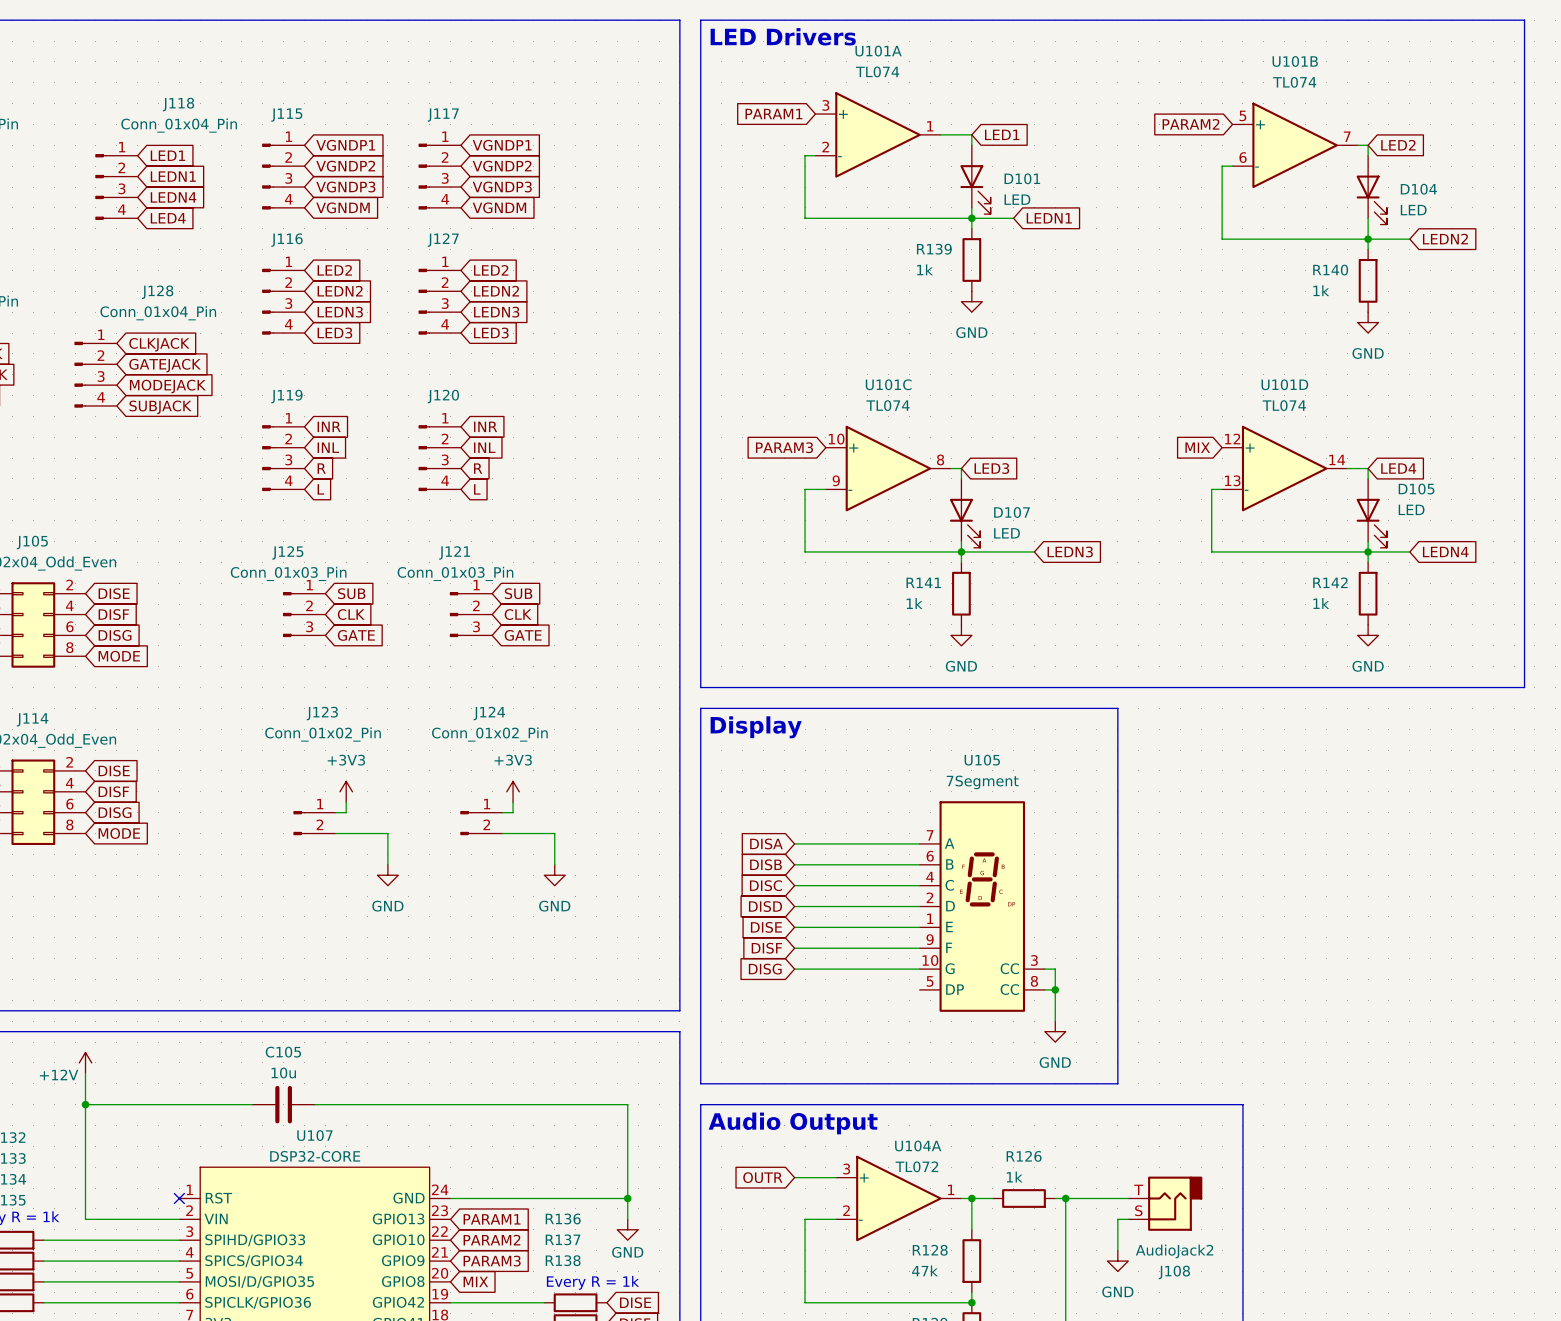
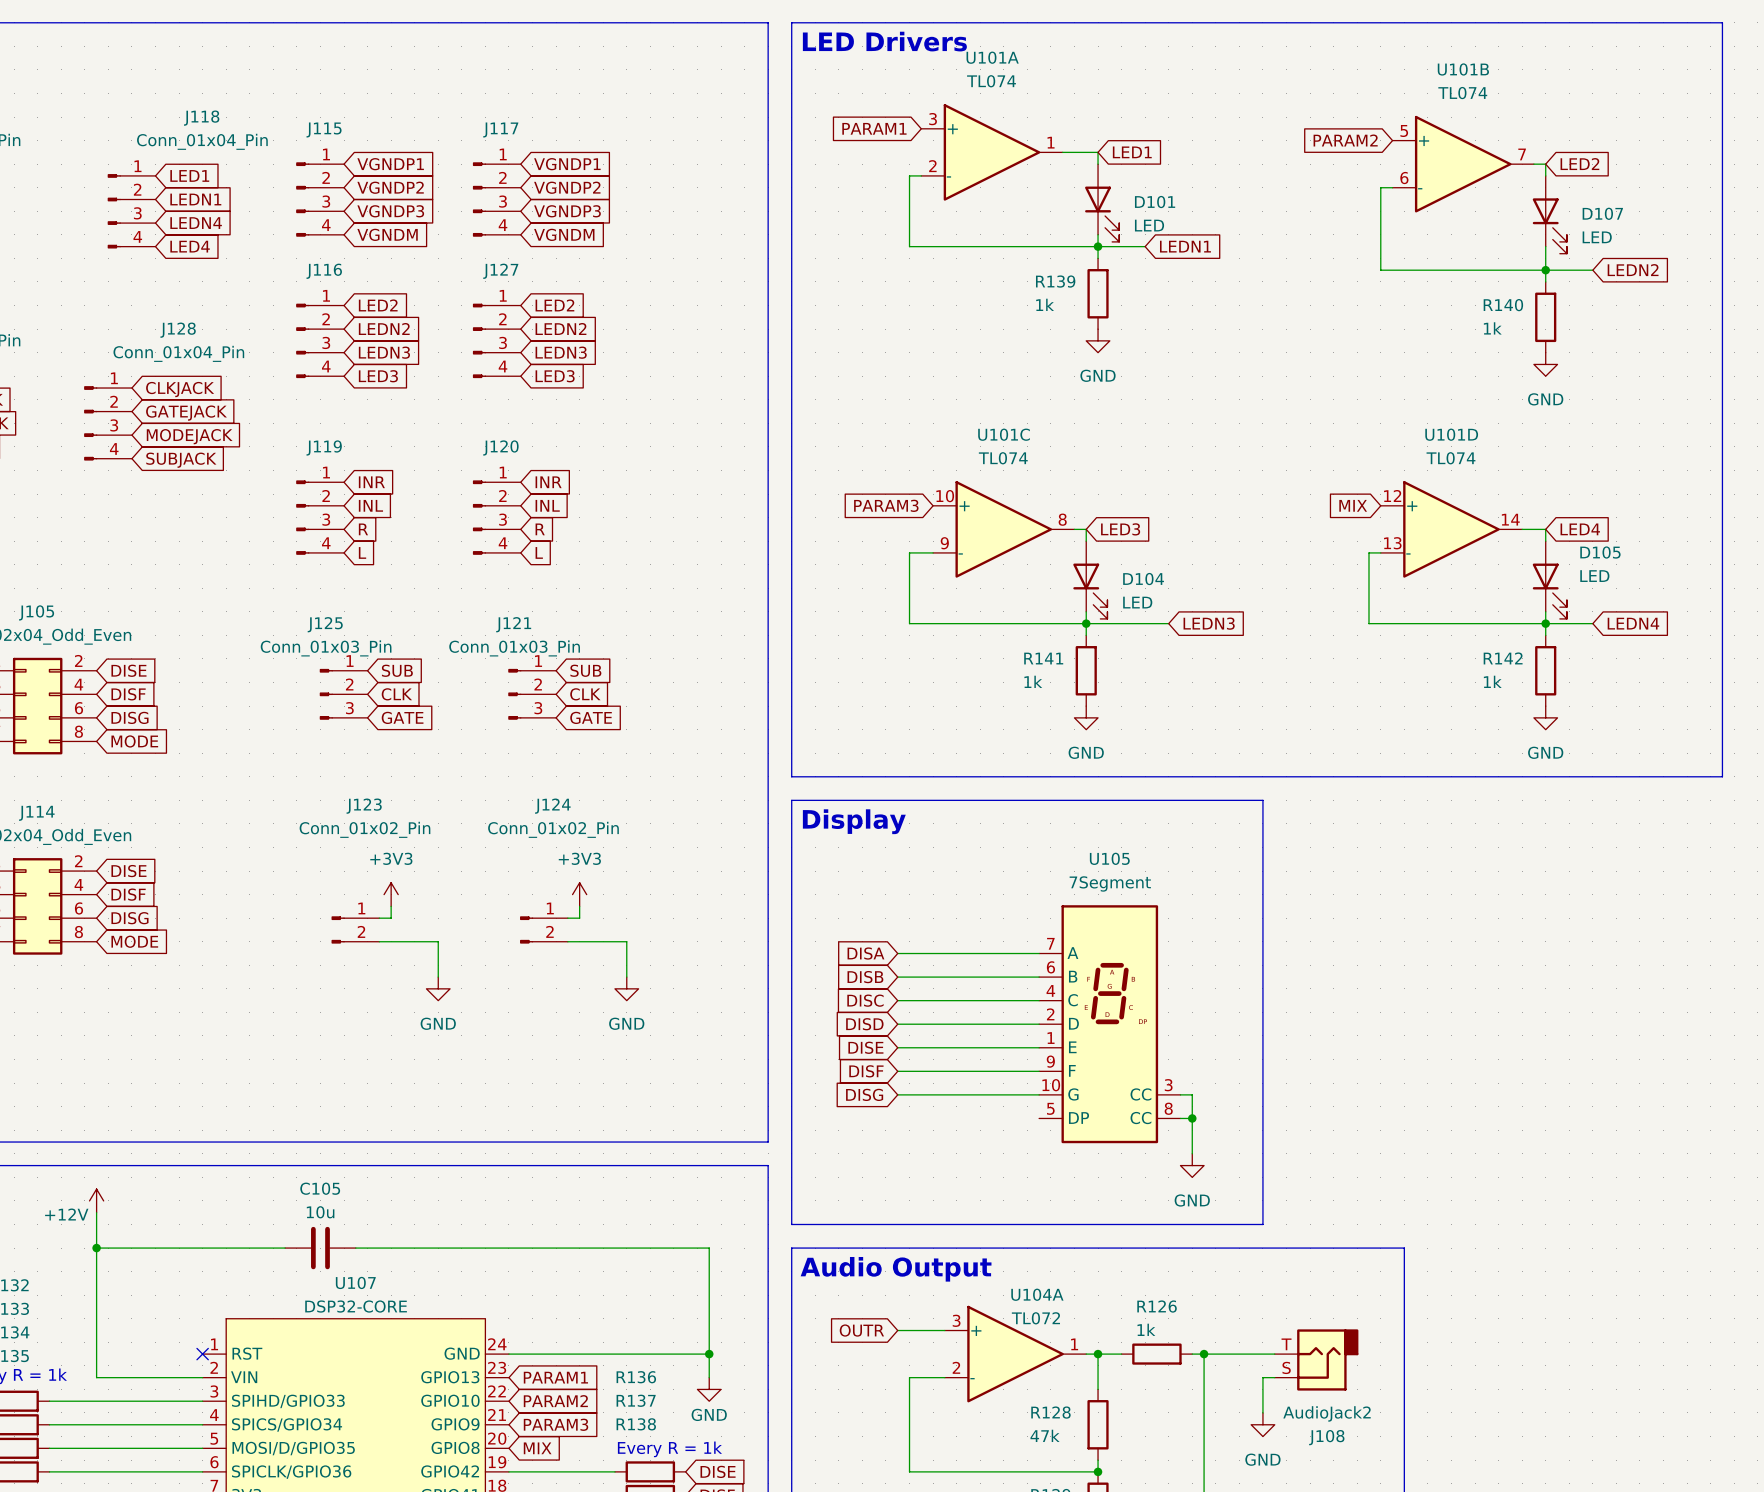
D104 name: D104 (1418, 189) -> D107 (1602, 213)
D107 name: D107 (1011, 512) -> D104 (1143, 579)

